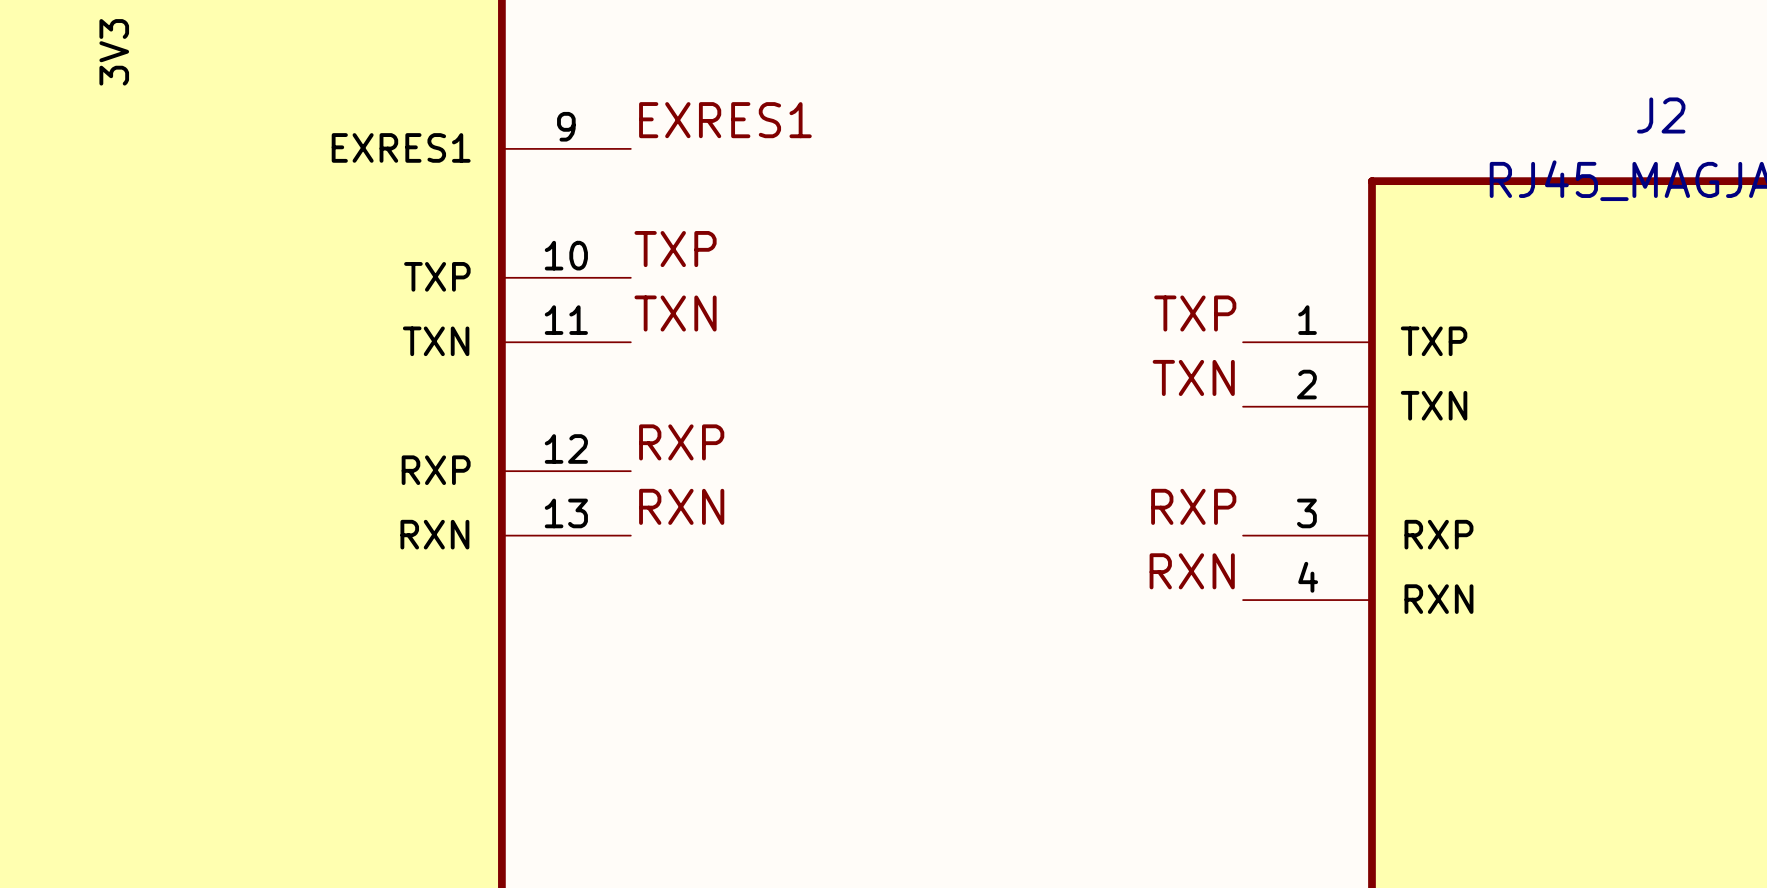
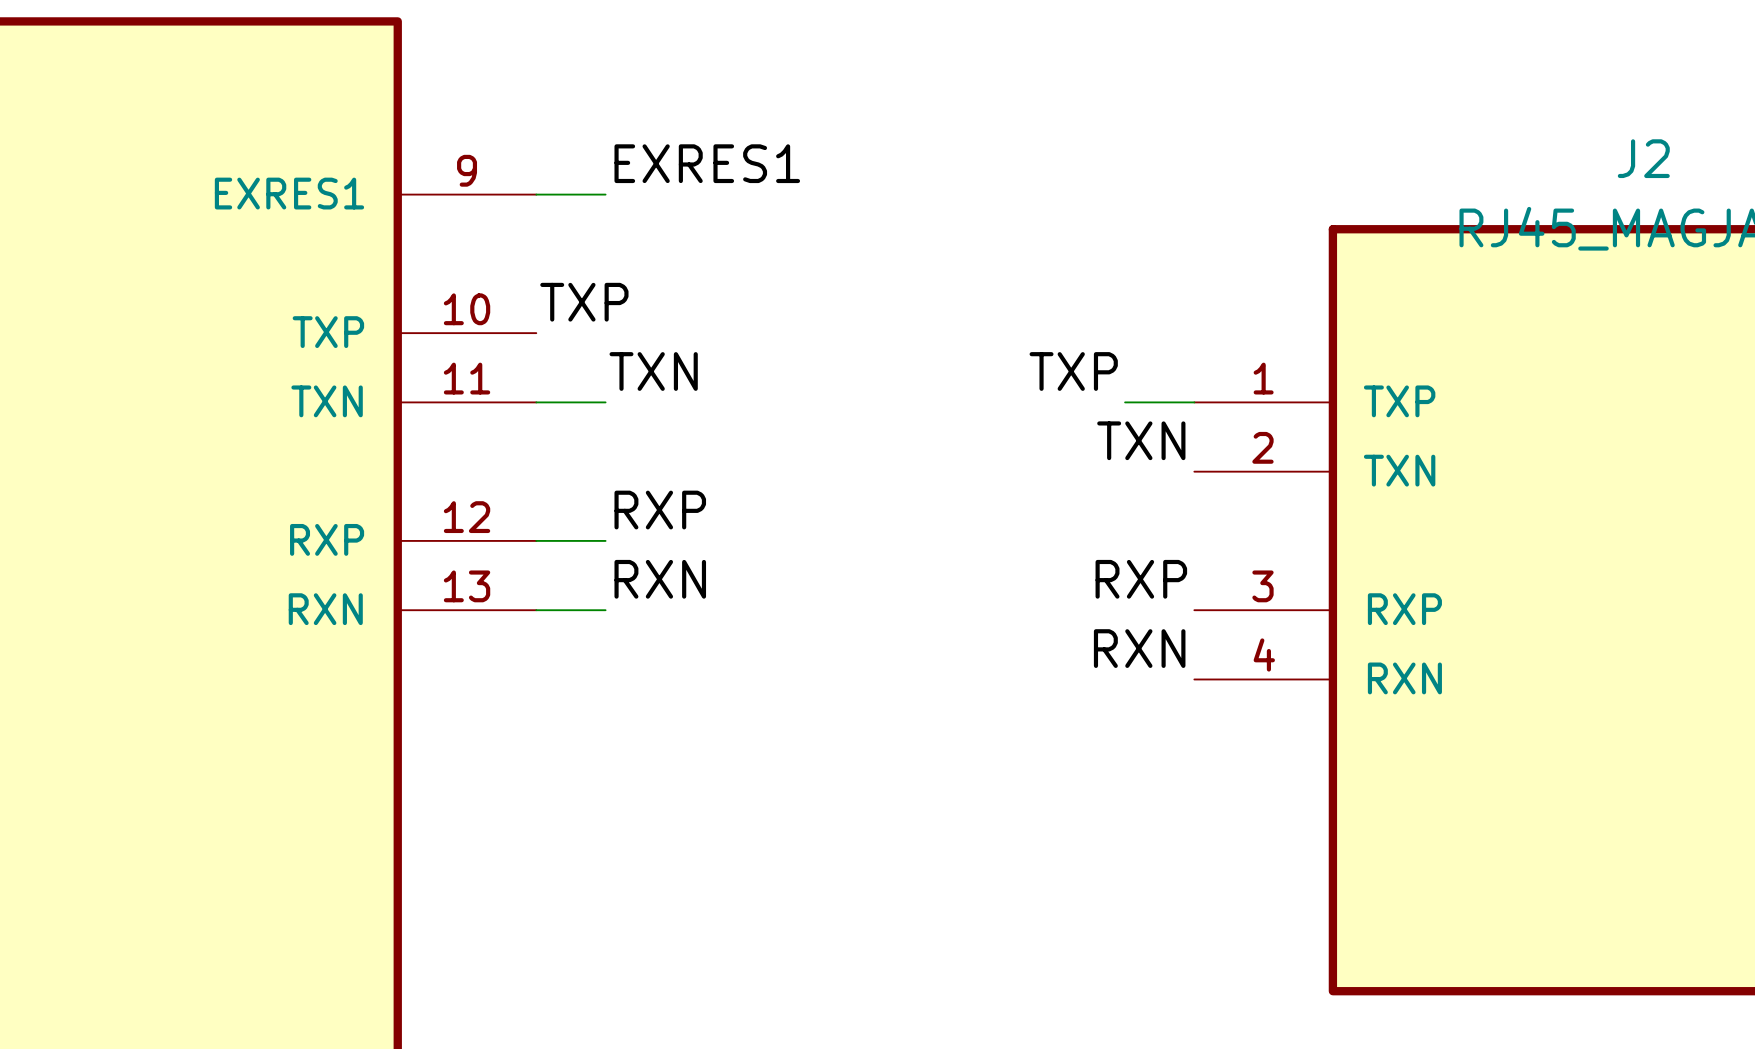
label position: EXRES1 (725, 120) -> EXRES1 (707, 163)
wire: none -> (536, 194) (605, 194)
label position: TXN (675, 313) -> TXN (653, 371)
label position: TXP (1195, 313) -> TXP (1073, 371)
wire: none -> (536, 402) (605, 402)
wire: none -> (1125, 402) (1194, 402)
label position: RXP (681, 442) -> RXP (660, 510)
wire: none -> (536, 540) (605, 540)
label position: RXN (681, 506) -> RXN (660, 579)
wire: none -> (536, 610) (605, 610)

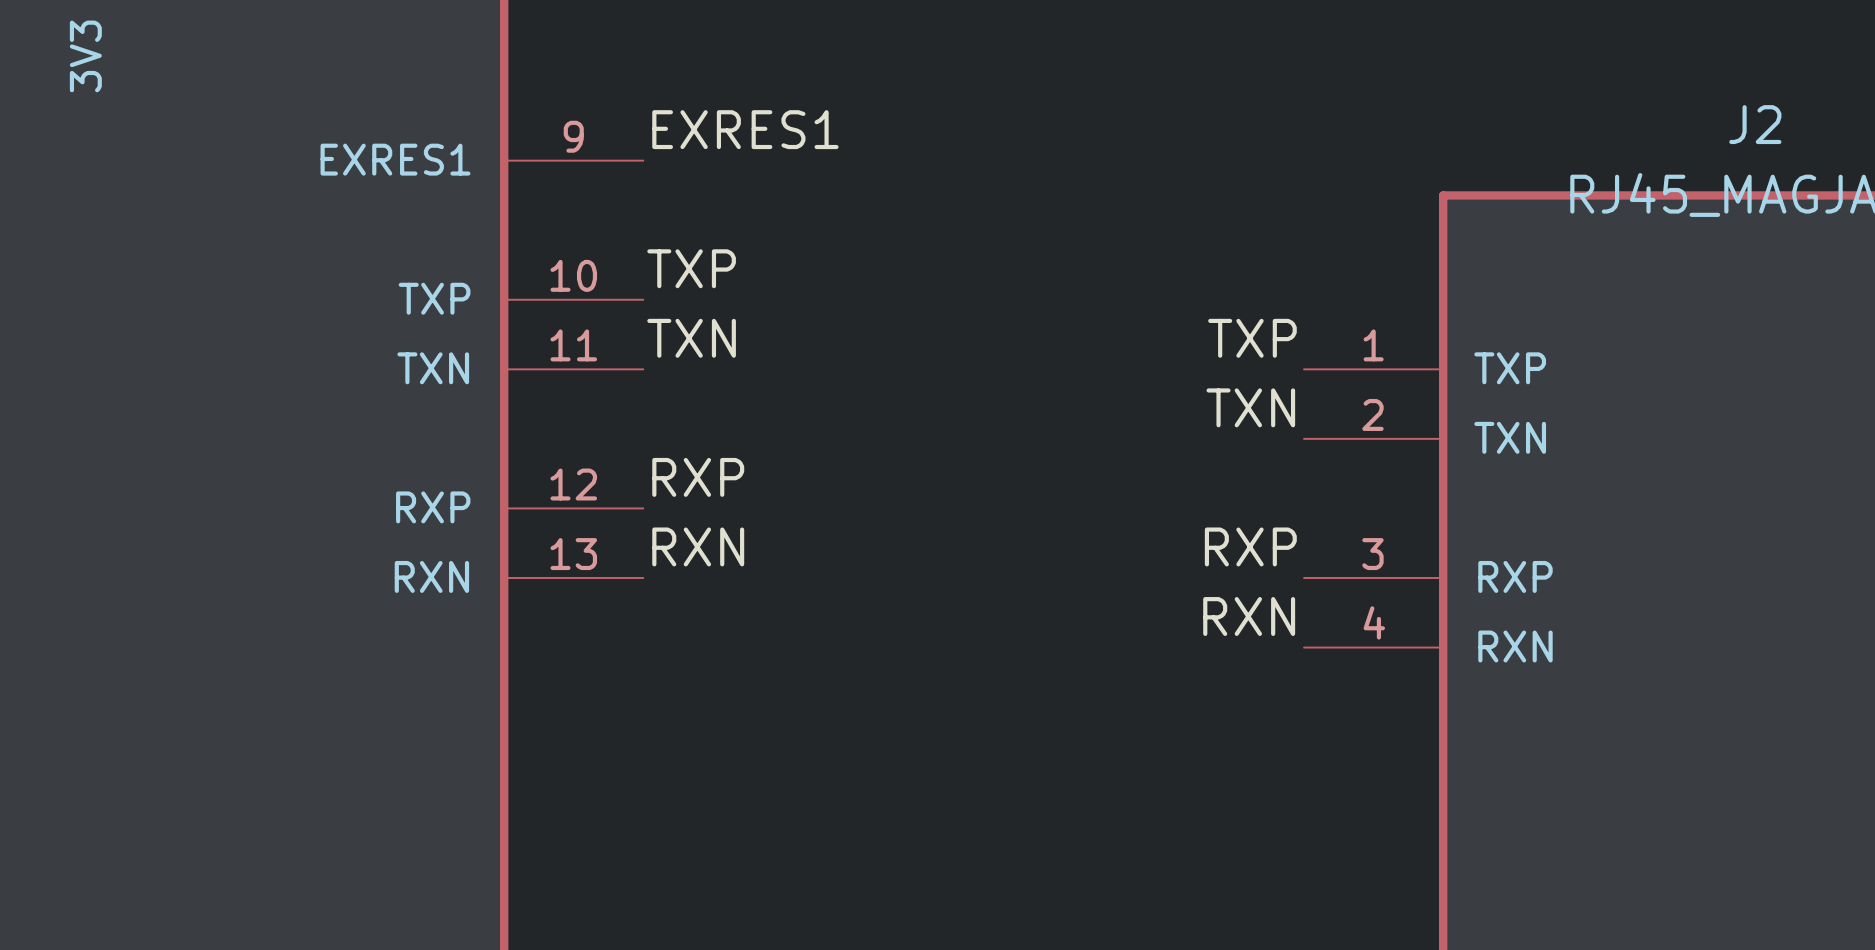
label position: EXRES1 (707, 163) -> EXRES1 (745, 129)
wire: (536, 194) (605, 194) -> none
label position: TXN (653, 371) -> TXN (691, 338)
label position: TXP (1073, 371) -> TXP (1252, 338)
wire: (536, 402) (605, 402) -> none
wire: (1125, 402) (1194, 402) -> none
label position: RXP (660, 510) -> RXP (698, 477)
wire: (536, 540) (605, 540) -> none
label position: RXN (660, 579) -> RXN (698, 546)
wire: (536, 610) (605, 610) -> none

